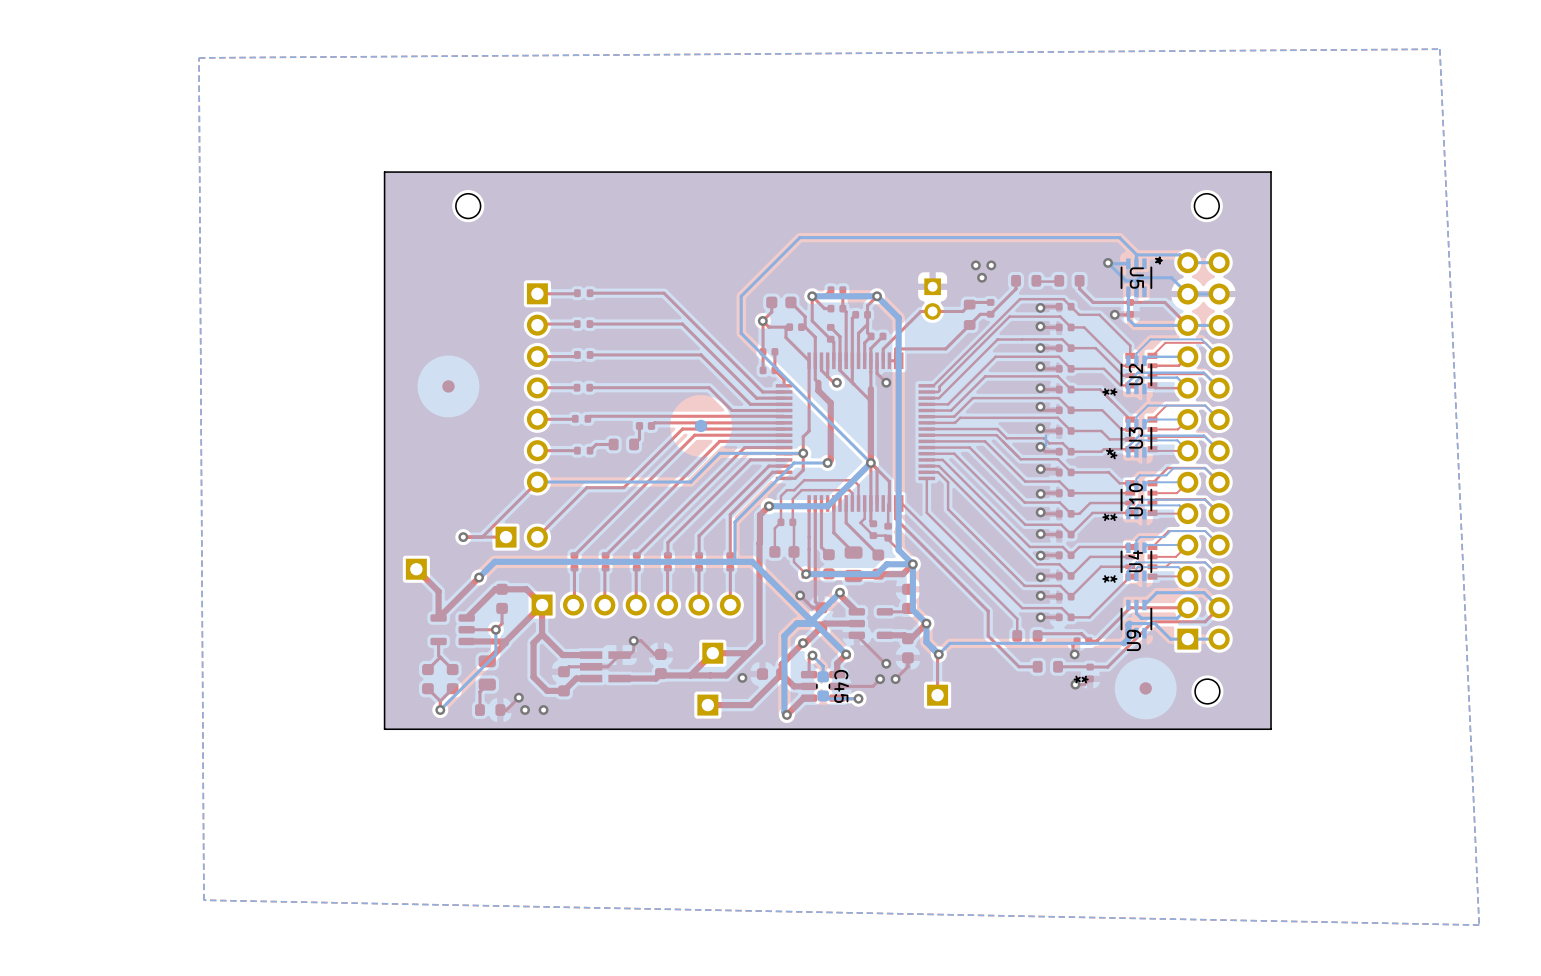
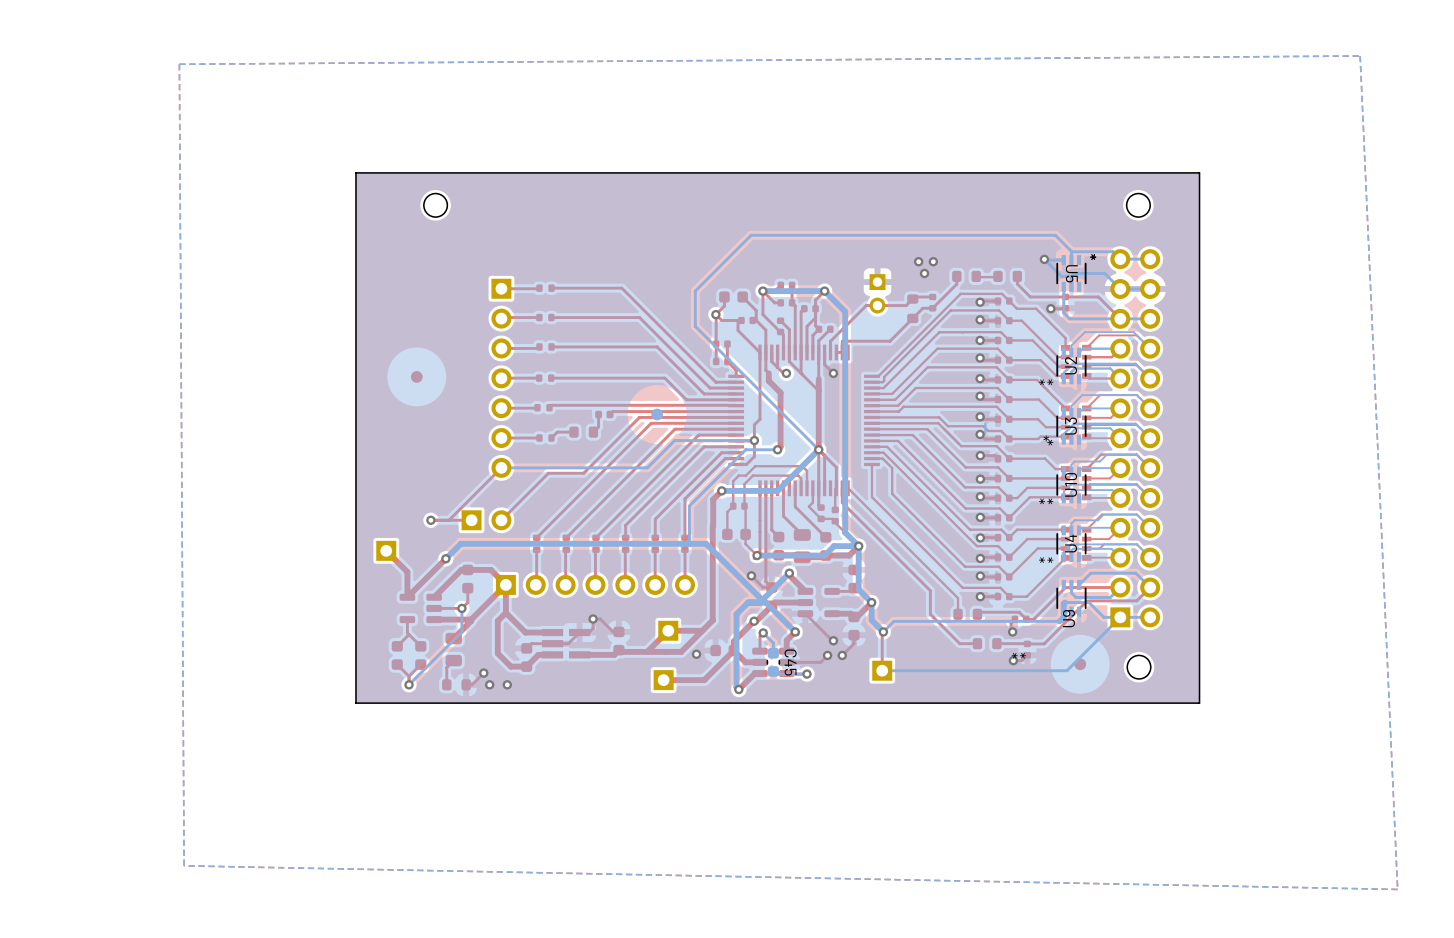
bottom track: none -> (1120, 617) (1066, 670) (882, 670)

